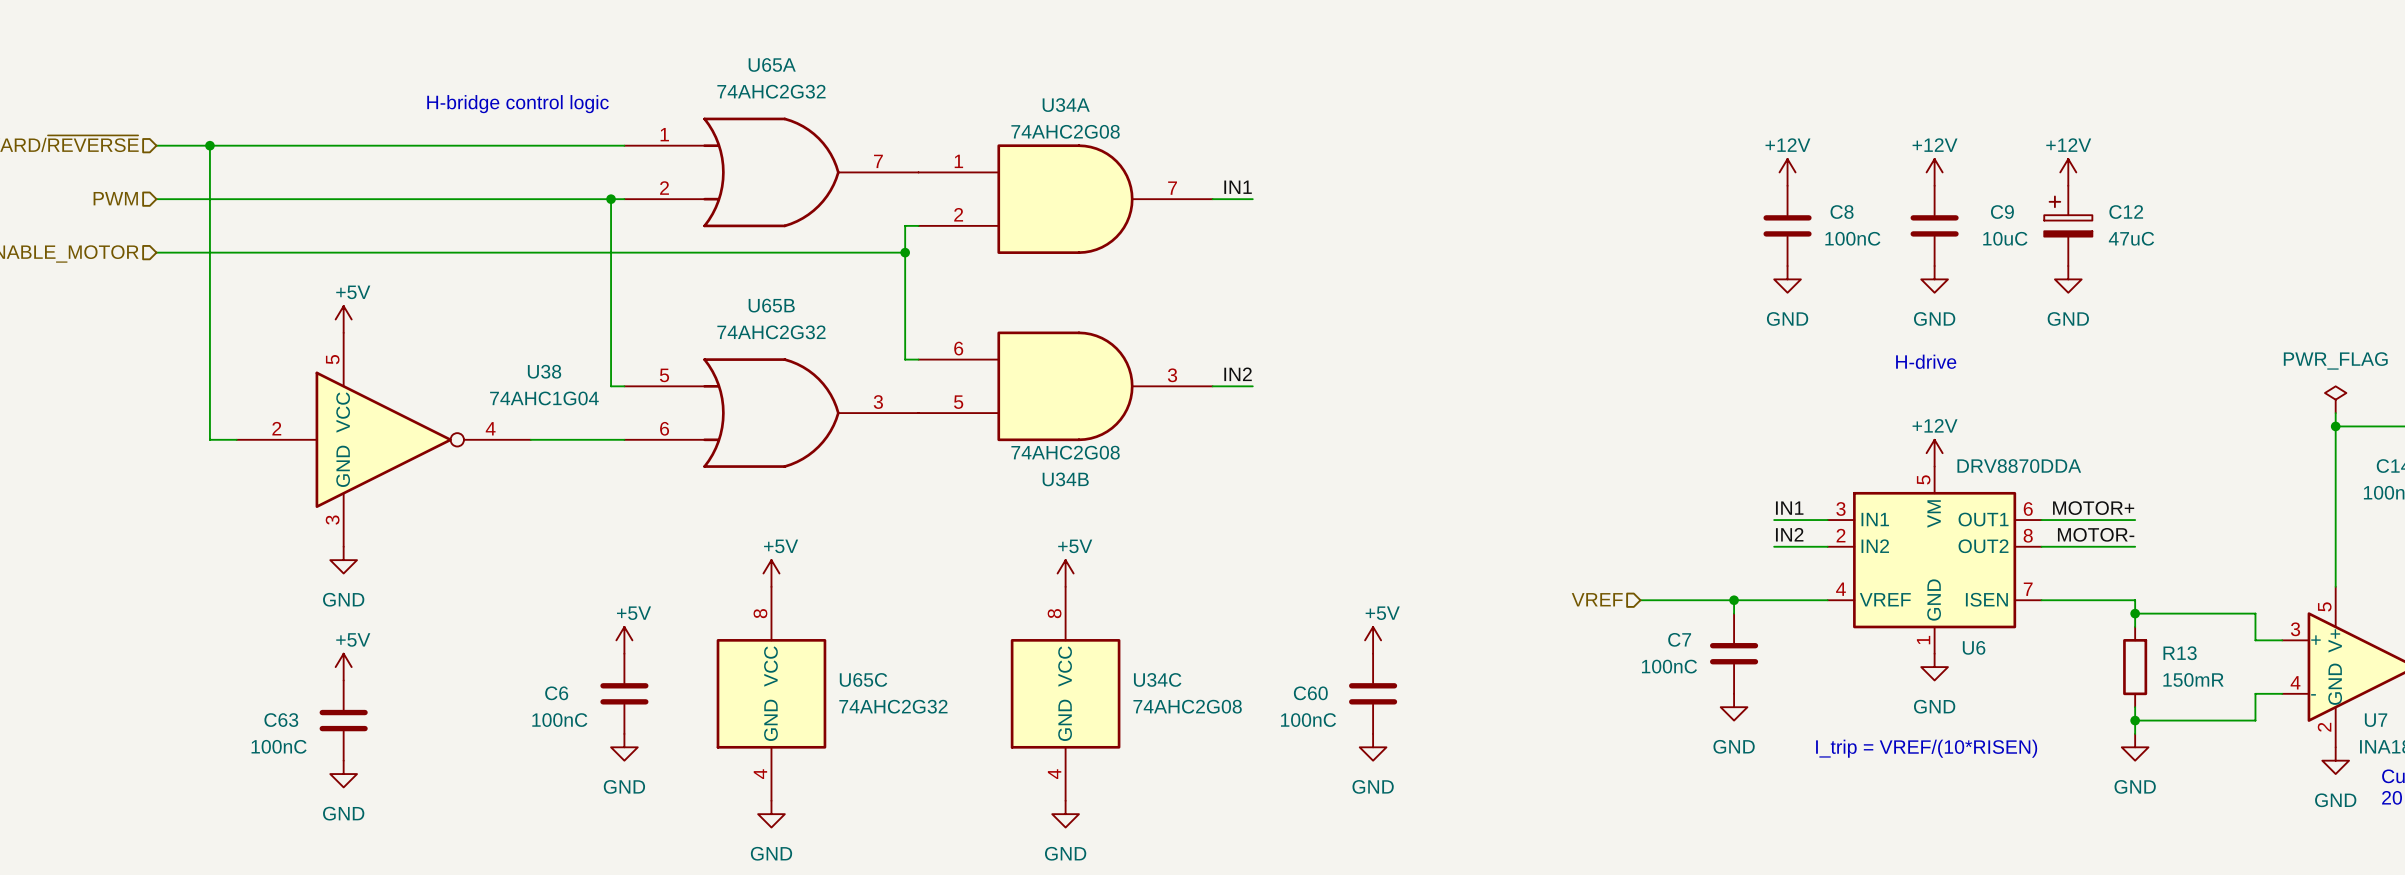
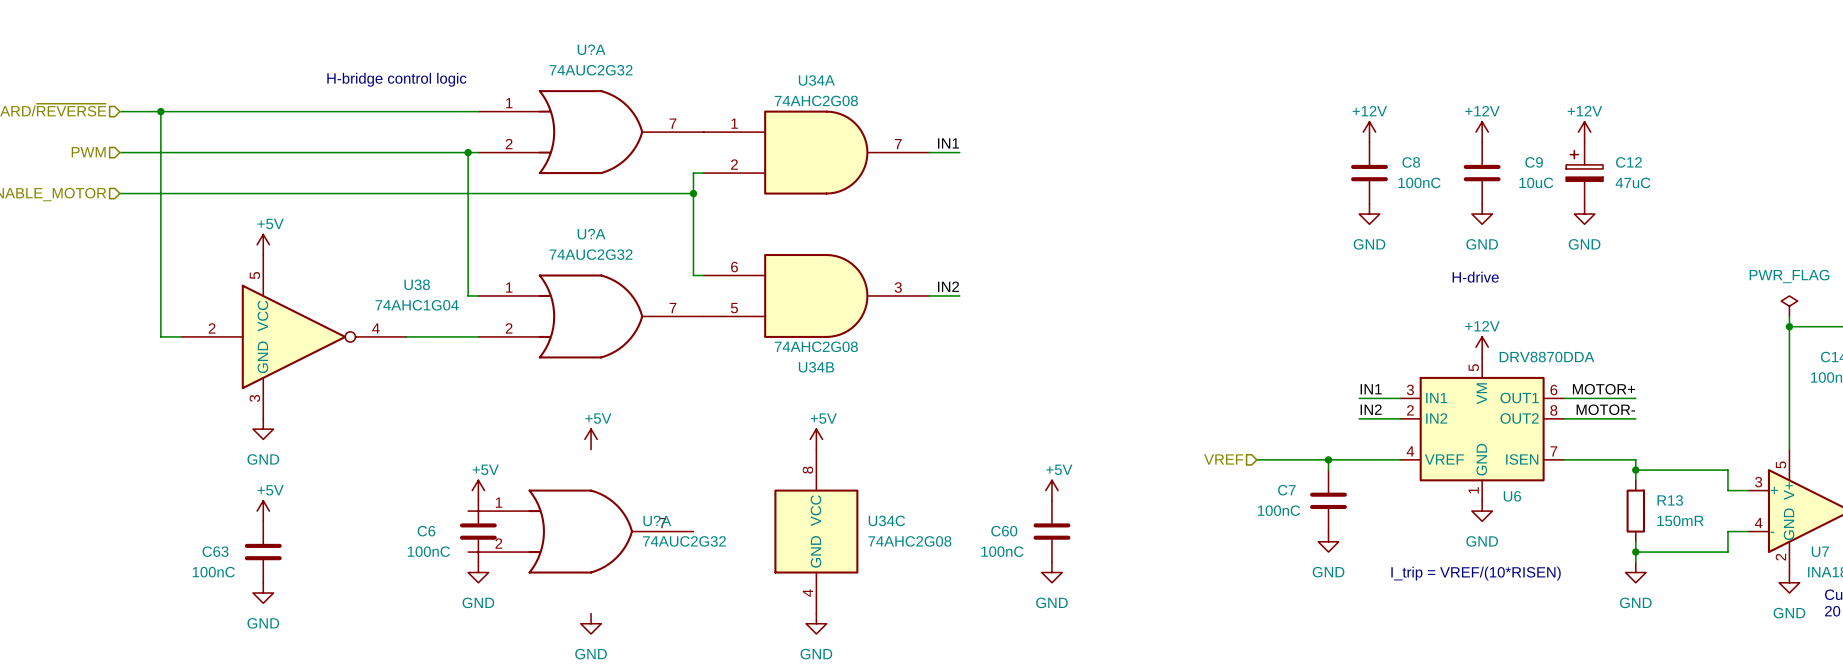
U65A name: U65A (772, 64) -> U?A (591, 49)
U65A value: 74AHC2G32 (771, 91) -> 74AUC2G32 (591, 70)
U65B name: U65B (771, 305) -> U?A (591, 234)
U65B value: 74AHC2G32 (771, 332) -> 74AUC2G32 (591, 254)
U65B pin number: 5 (664, 375) -> 1 (509, 287)
U65B pin number: 3 (878, 402) -> 7 (672, 308)
U65B pin number: 6 (664, 428) -> 2 (509, 328)
U?A: none -> 74AUC2G32 (580, 531)
U65C: 74AHC2G32 (771, 693) -> none

